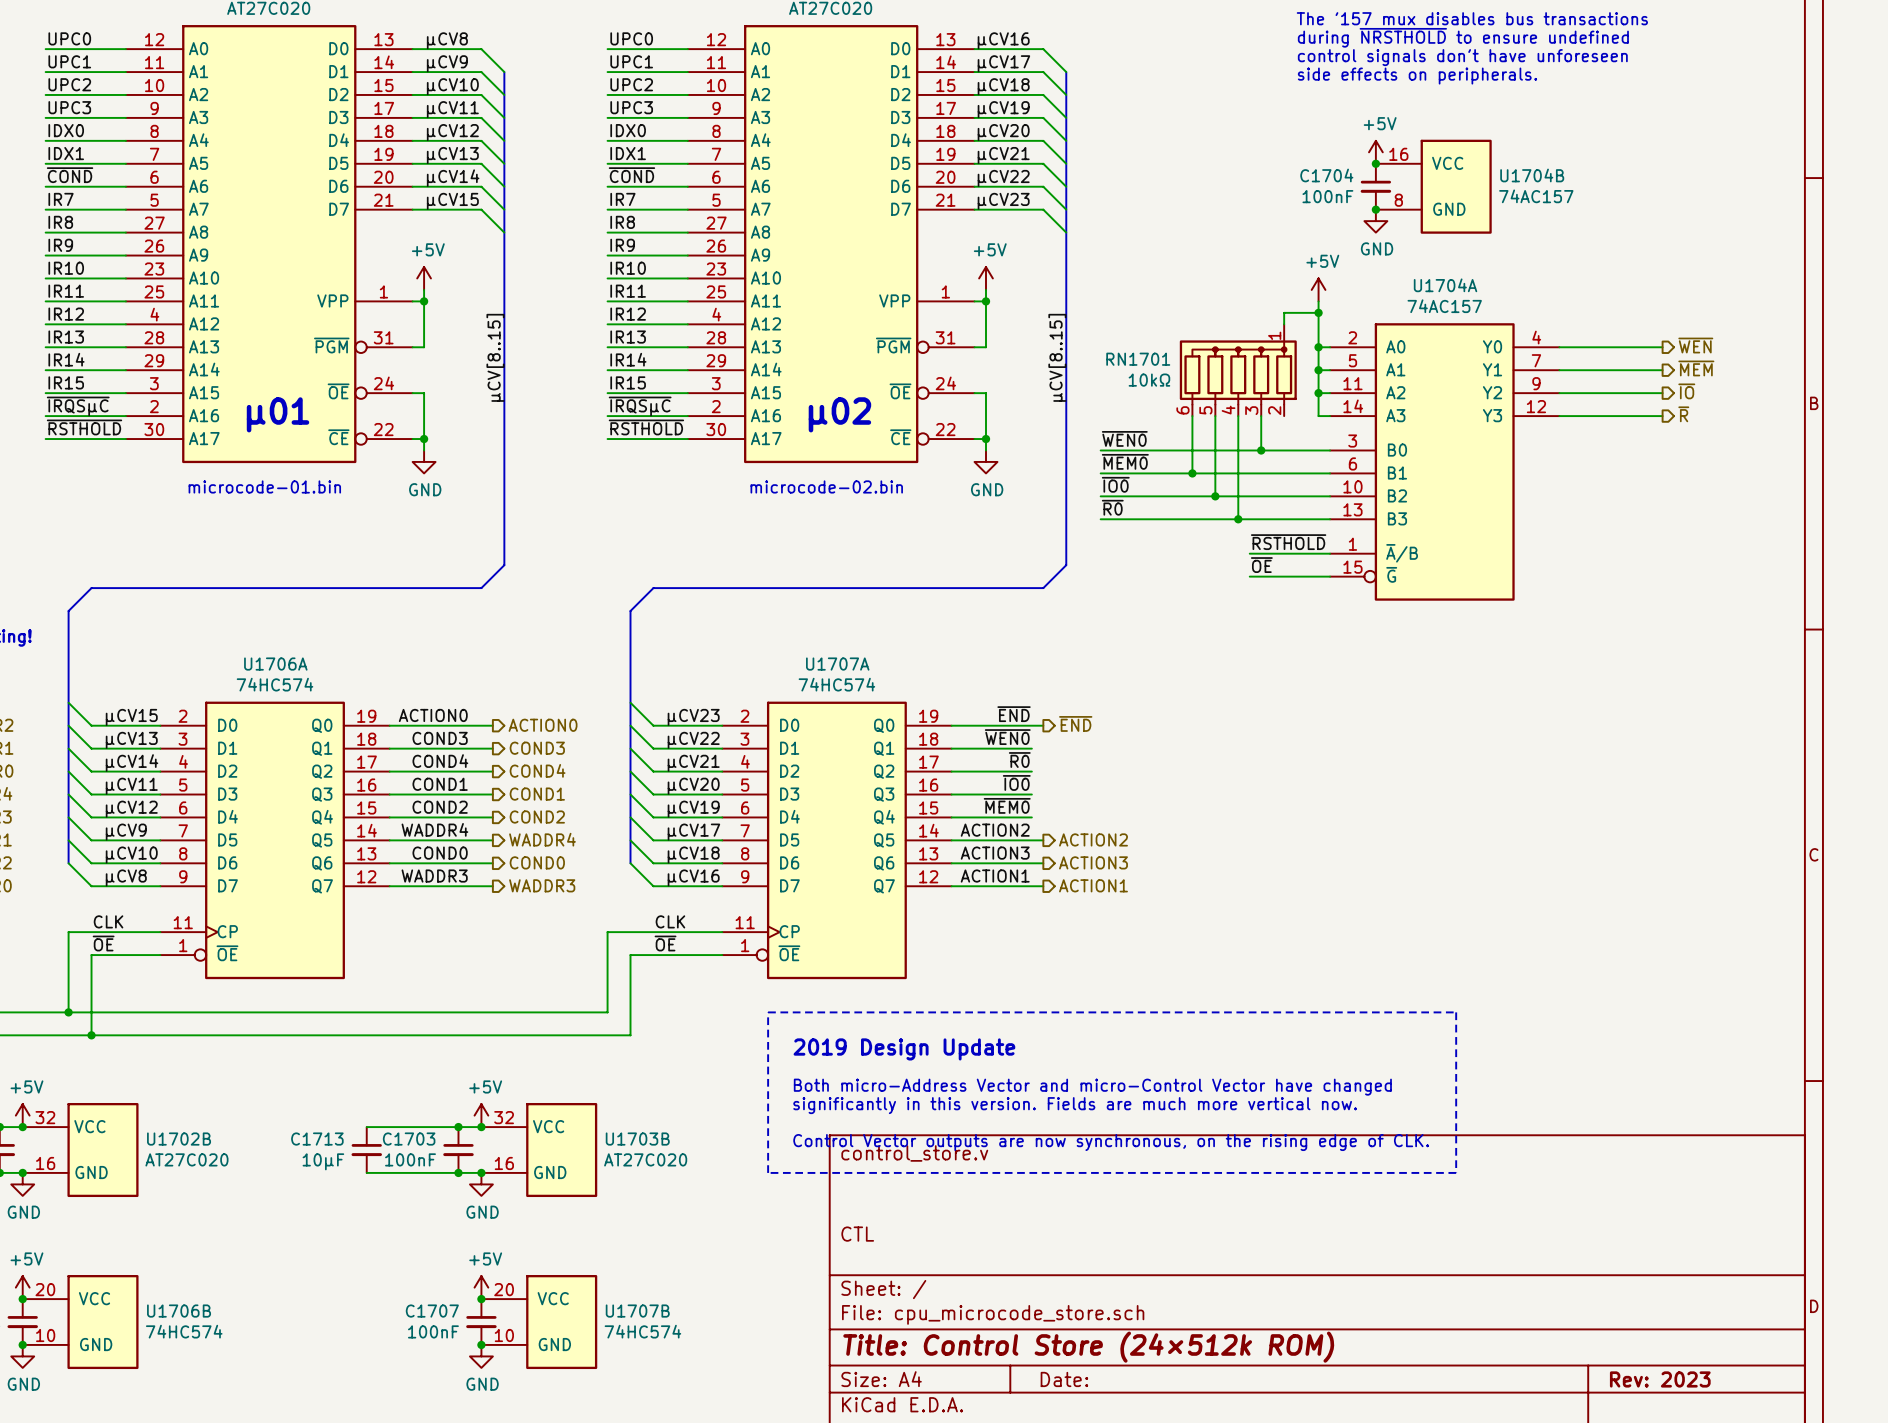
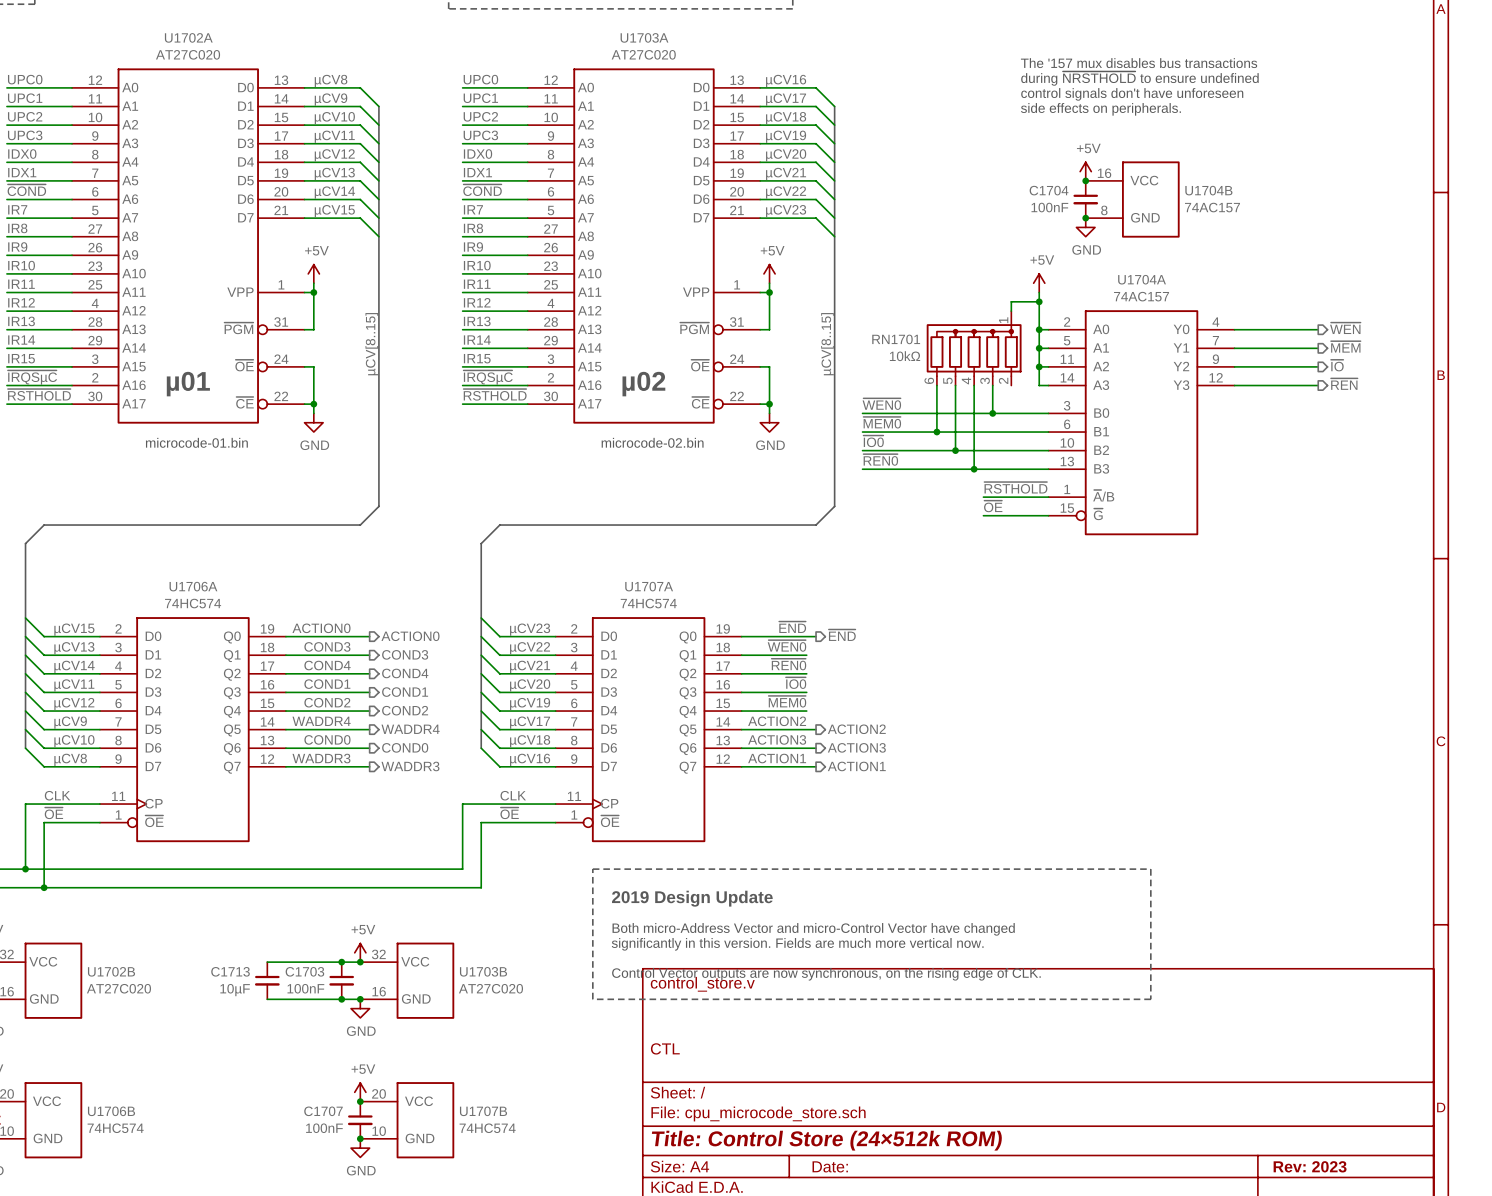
hierarchical label: ~{R} (1683, 414) -> ~{REN} (1344, 384)
label: ~{R0} (1112, 507) -> ~{REN0} (880, 459)
label: ~{R0} (1019, 760) -> ~{REN0} (788, 664)

